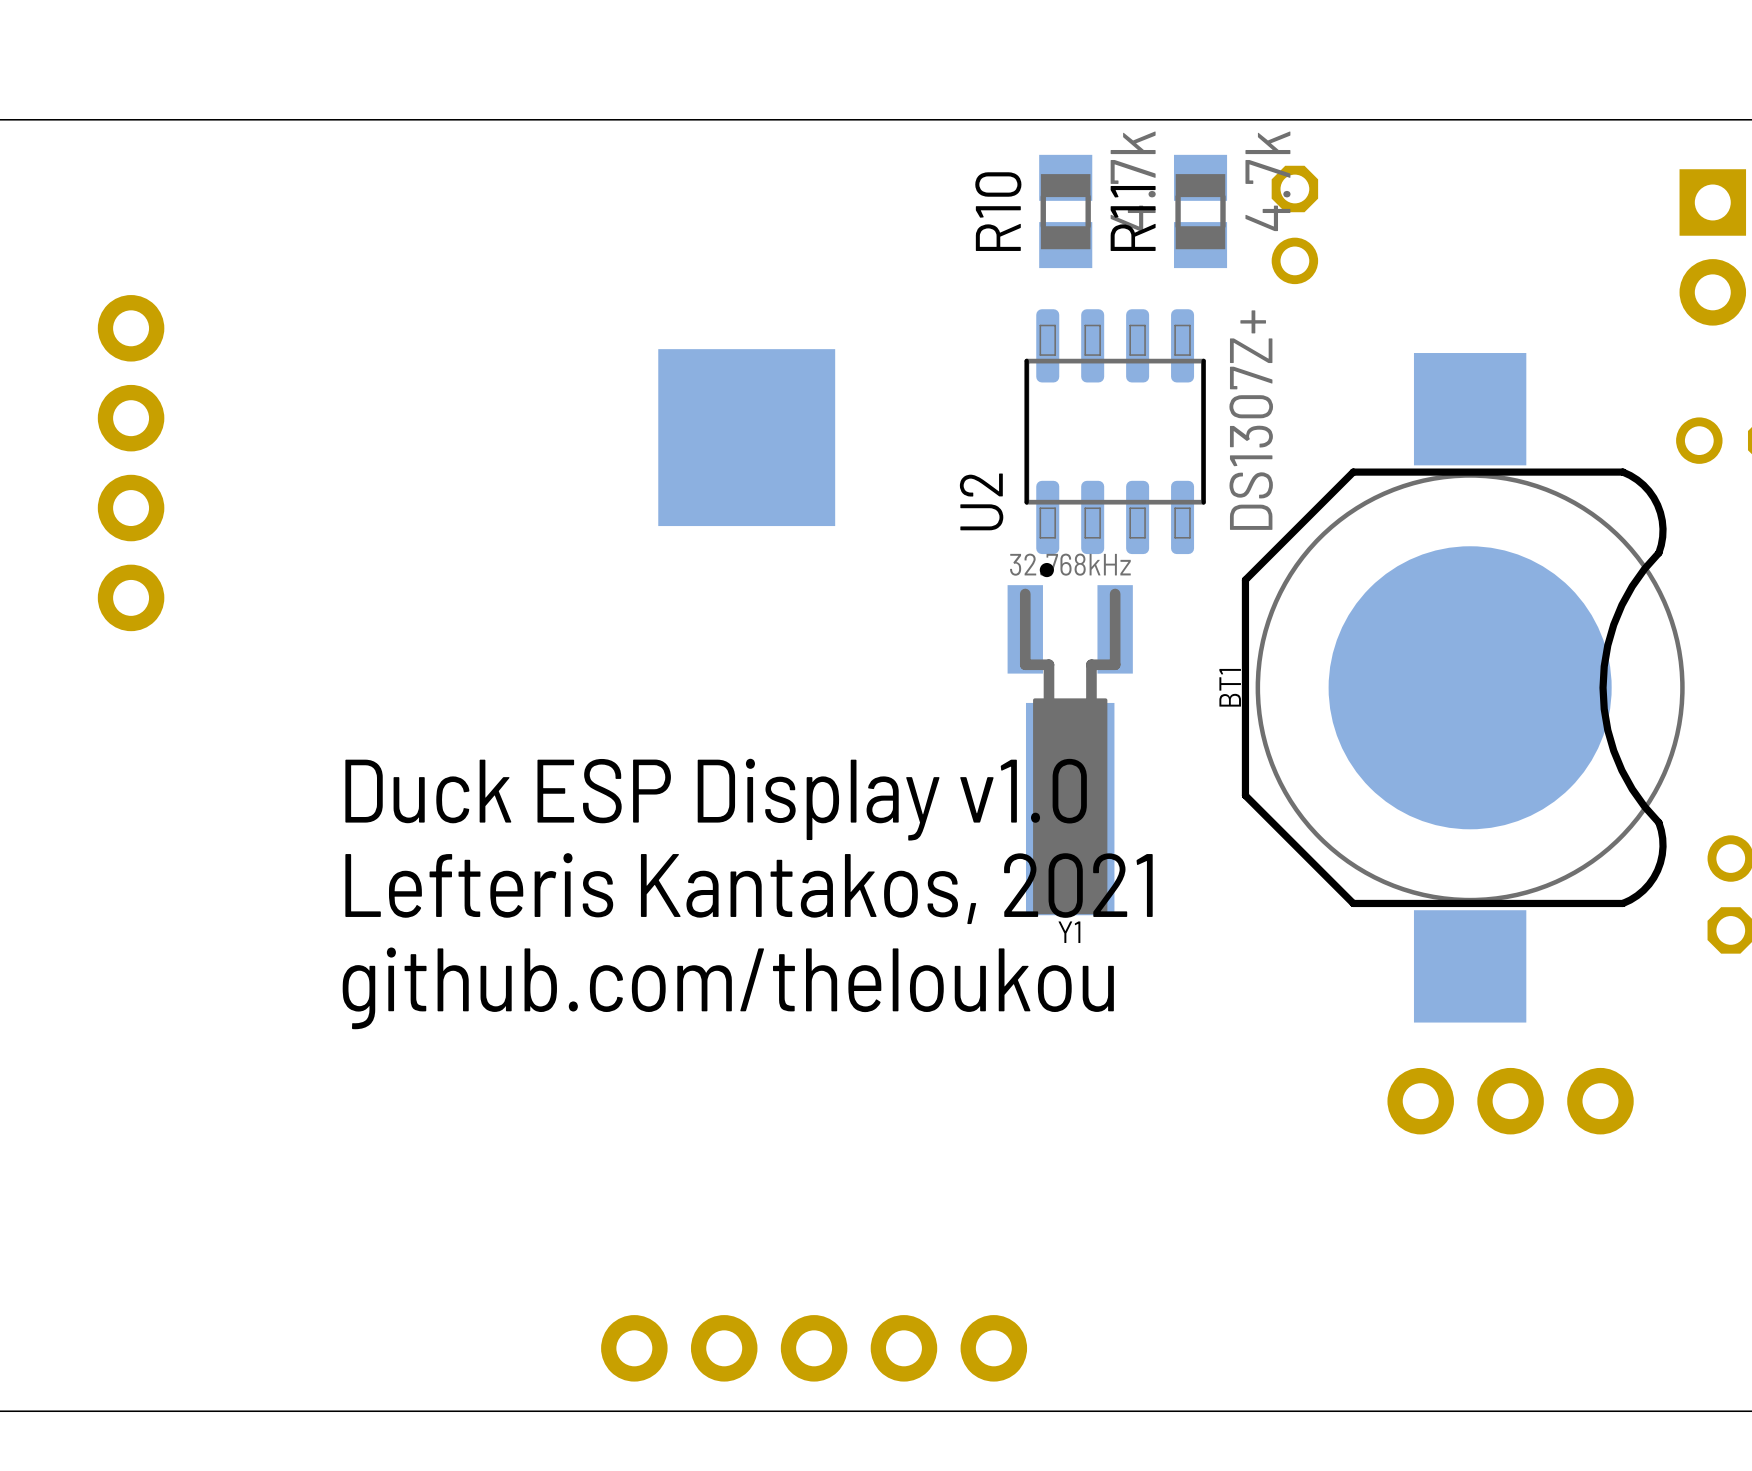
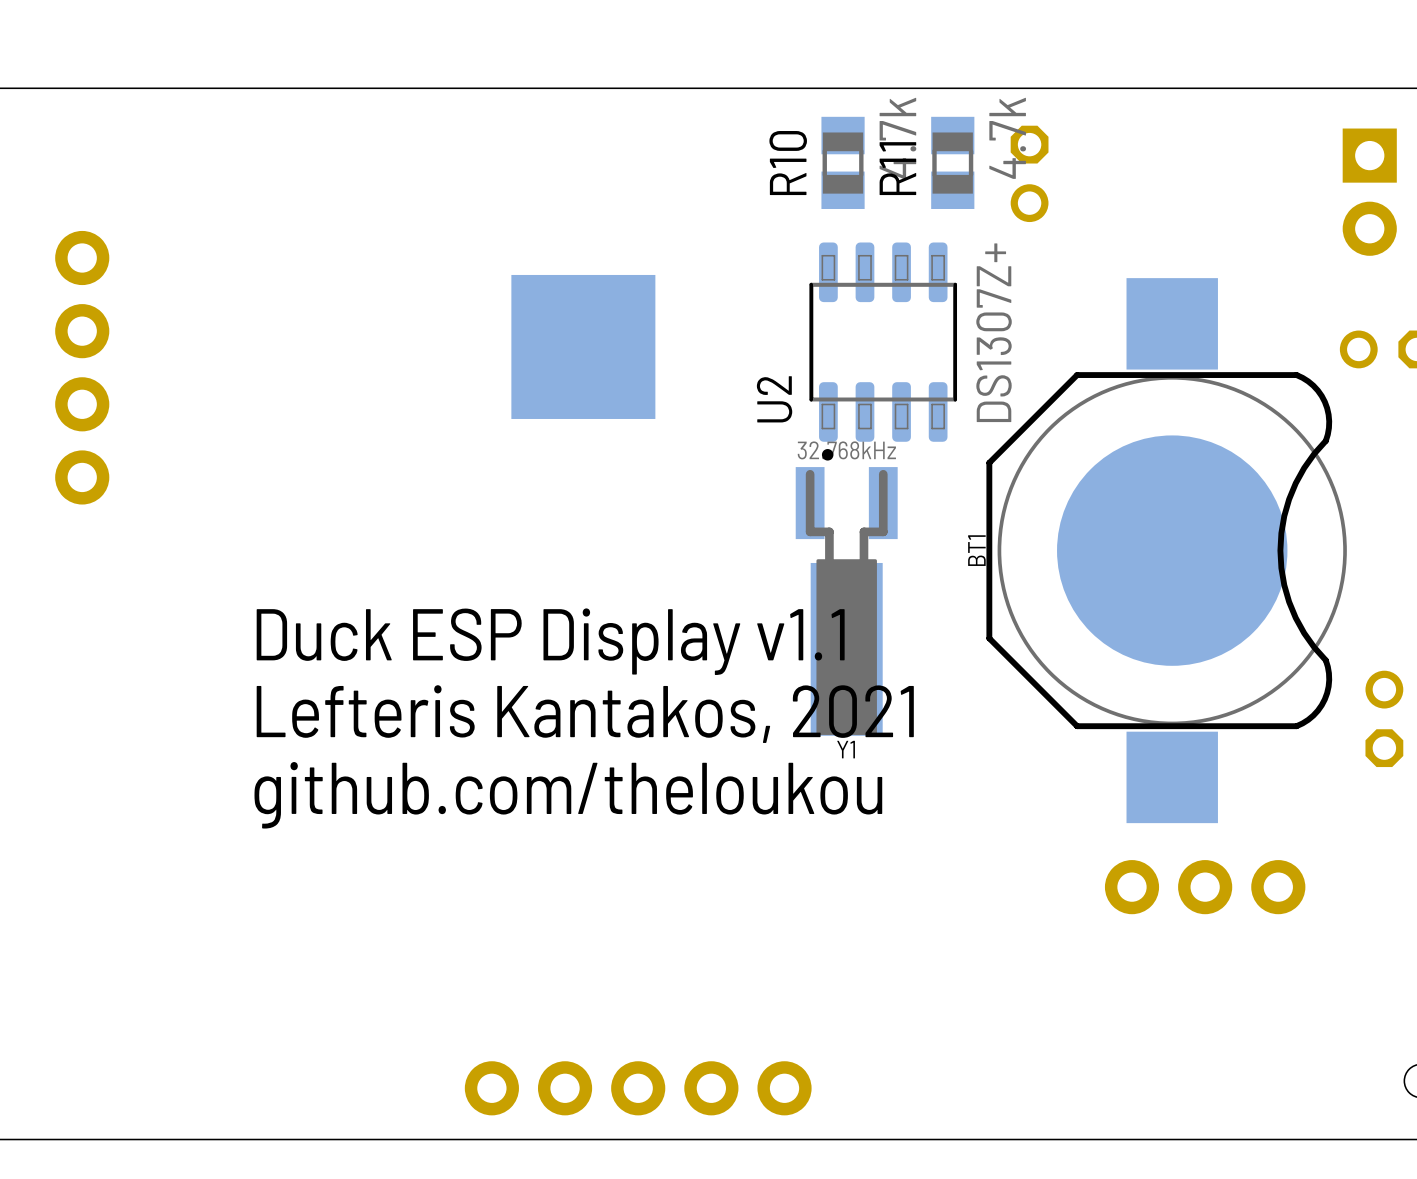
text: Duck ESP Display v1.0 (716, 799) -> Duck ESP Display v1.1 (550, 641)

